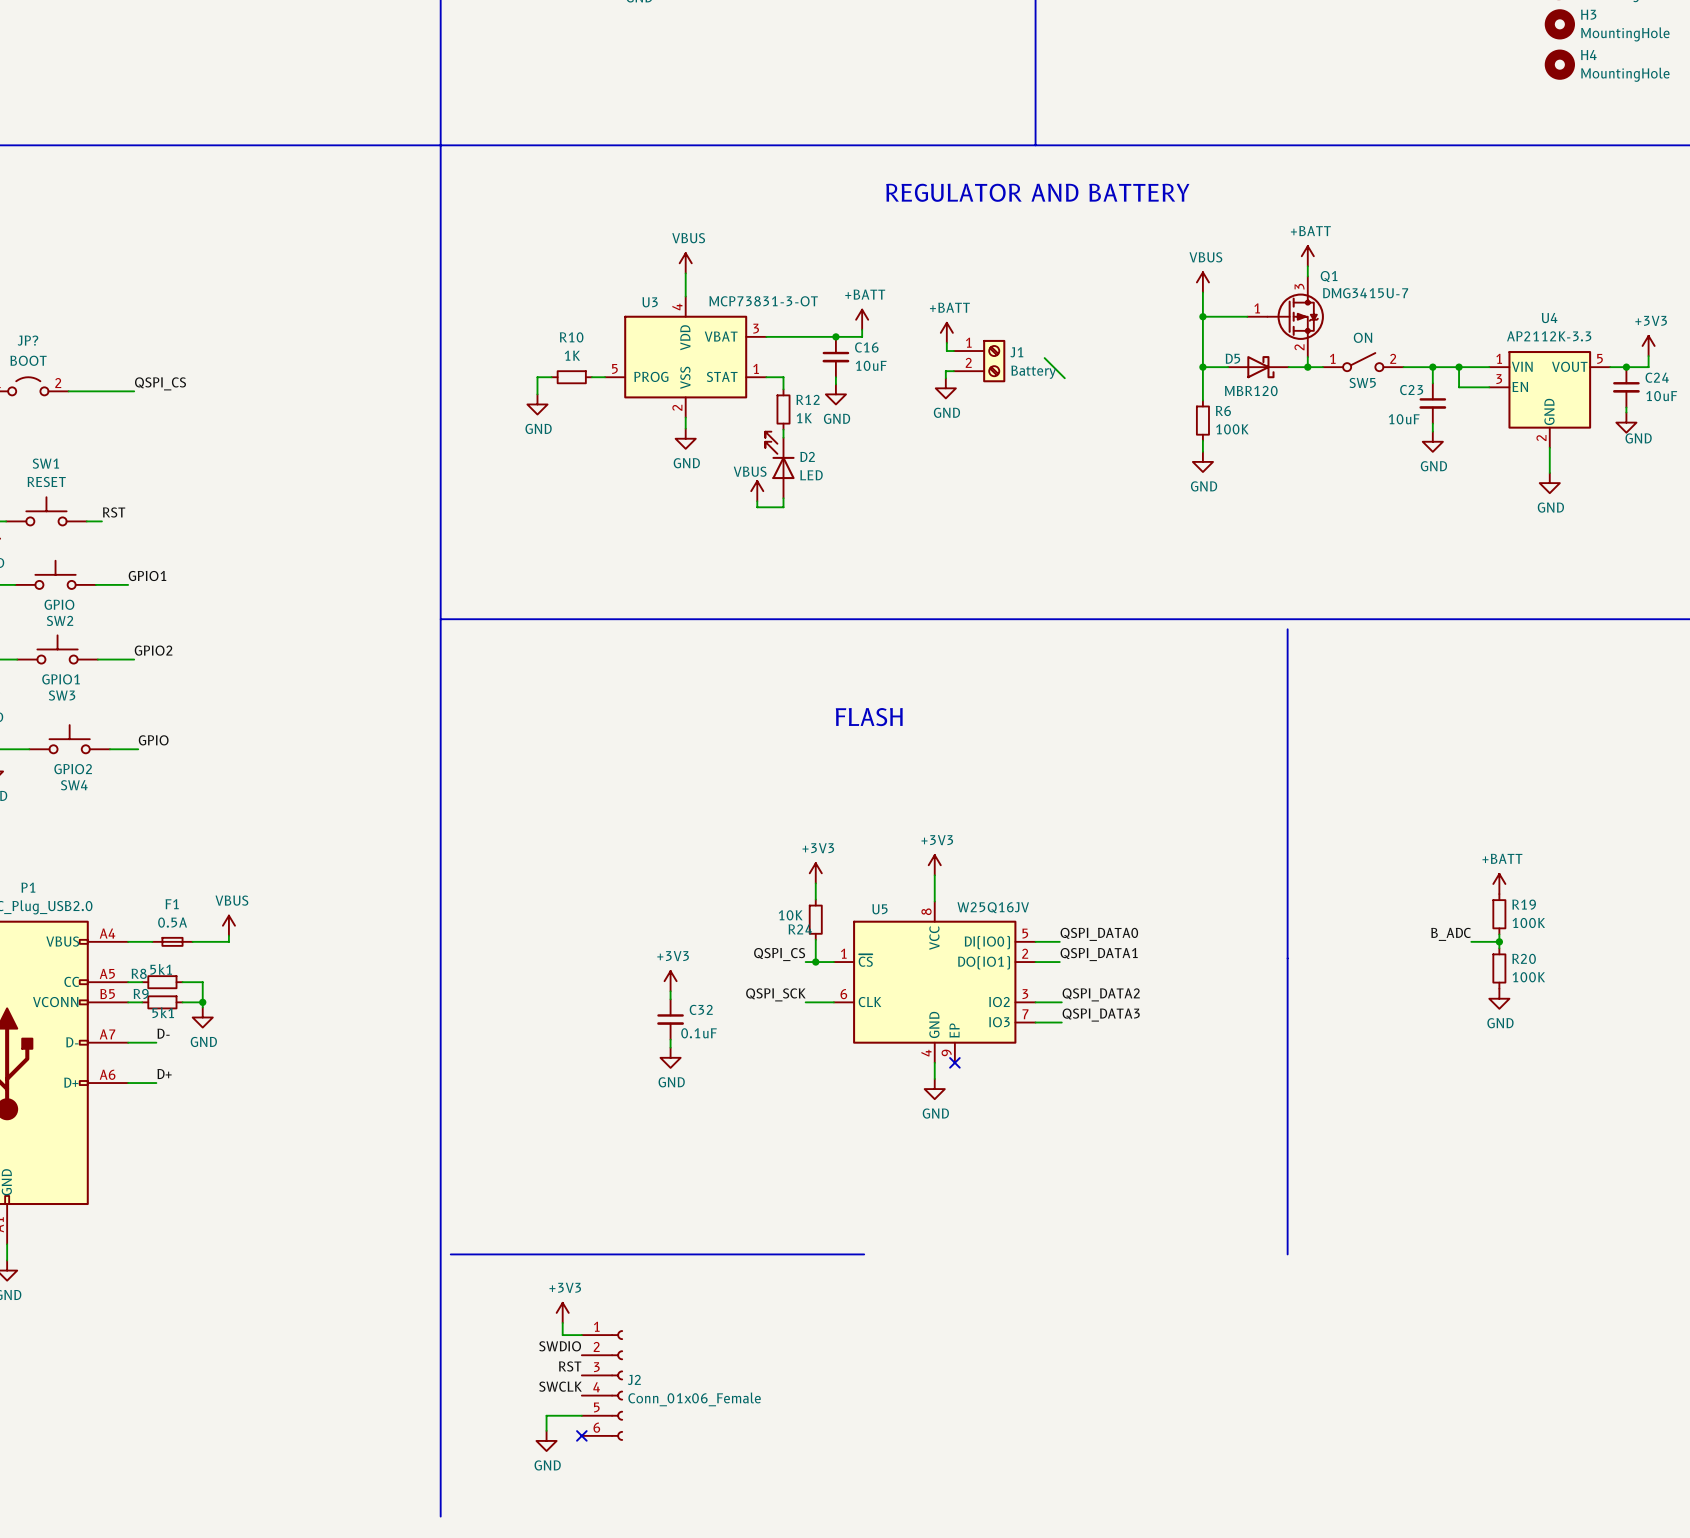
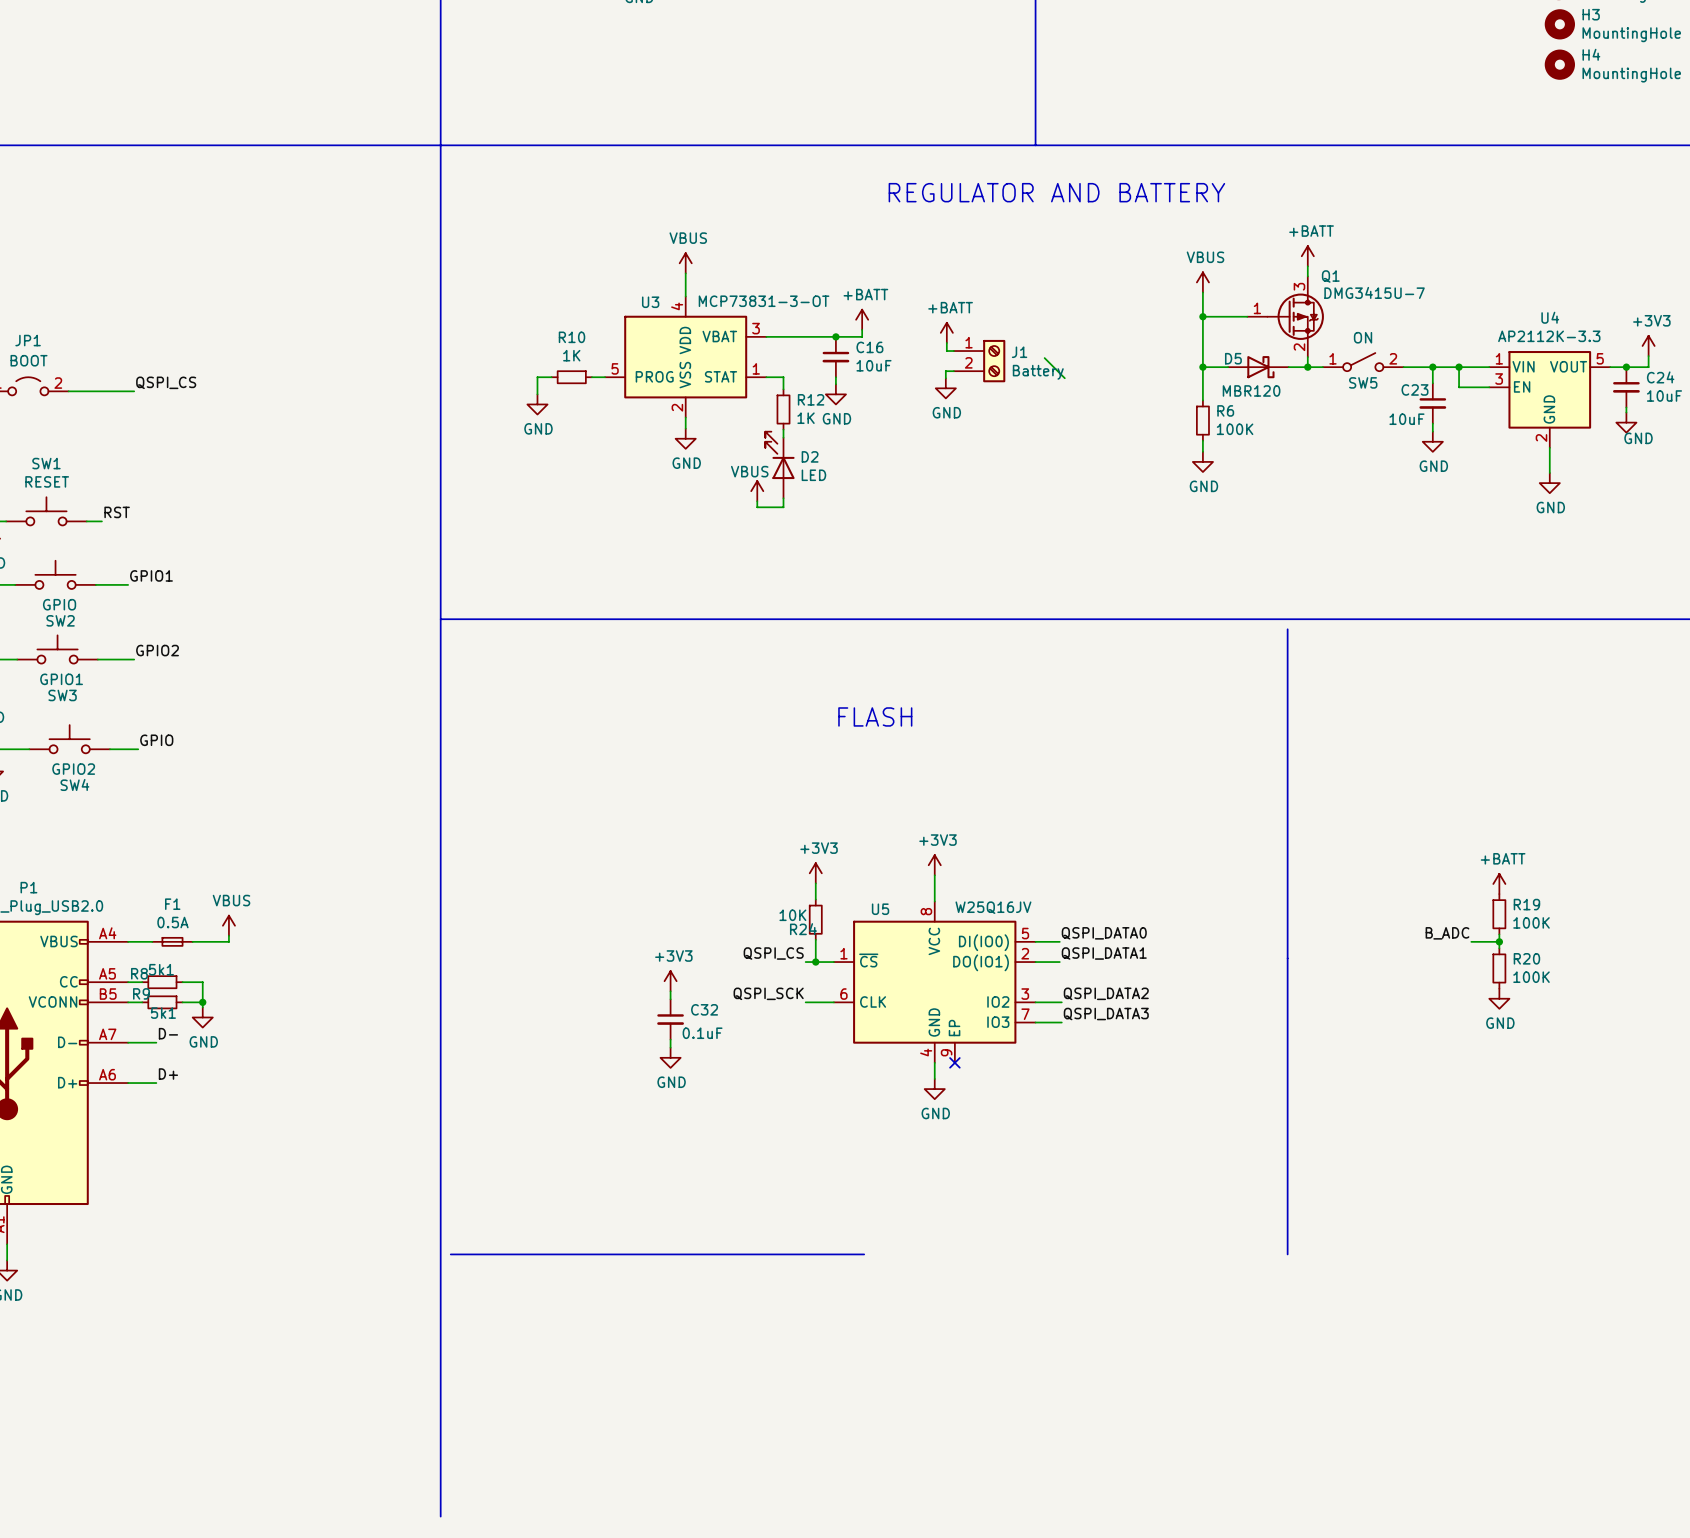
JP? name: JP? (27, 340) -> JP1 (28, 340)
power symbol: +3V3 (562, 1312) -> none
wire: (562, 1322) (562, 1335) (581, 1335) -> none
label: SWDIO (560, 1346) -> none
label: RST (570, 1366) -> none
J2: Conn_01x06_Female (602, 1385) -> none
label: SWCLK (560, 1386) -> none
wire: (581, 1415) (546, 1415) (546, 1430) -> none
no-connect mark: (581, 1435) -> none
power symbol: GND (546, 1440) -> none

